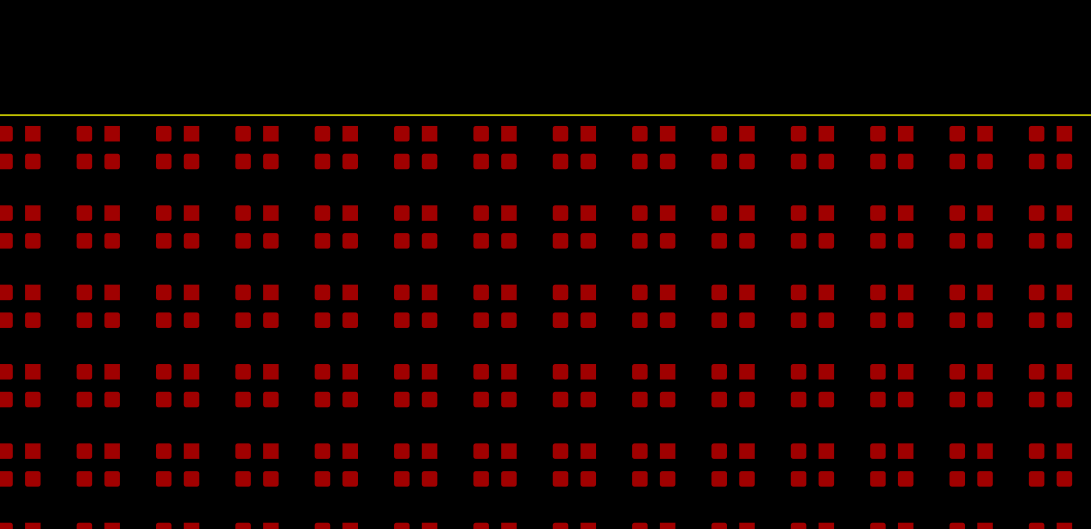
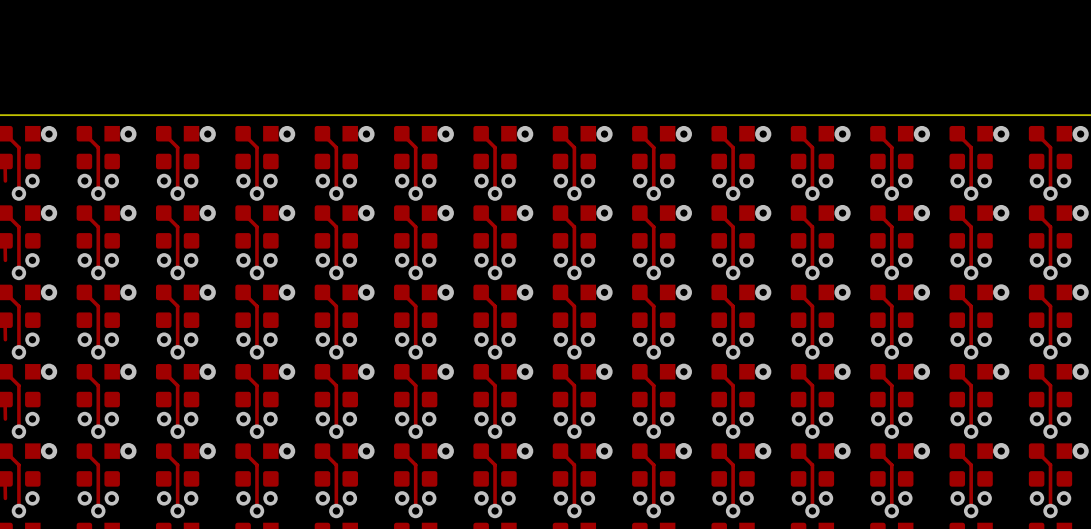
top track: none -> (5, 133) (18, 147) (18, 193)
top track: none -> (84, 133) (98, 147) (98, 193)
top track: none -> (163, 133) (177, 147) (177, 193)
top track: none -> (243, 133) (256, 147) (256, 193)
top track: none -> (322, 133) (336, 147) (336, 193)
top track: none -> (401, 133) (415, 147) (415, 193)
top track: none -> (481, 133) (495, 147) (495, 193)
top track: none -> (560, 133) (574, 147) (574, 193)
top track: none -> (639, 133) (653, 147) (653, 193)
top track: none -> (719, 133) (733, 147) (733, 193)
top track: none -> (798, 133) (812, 147) (812, 193)
top track: none -> (877, 133) (891, 147) (891, 193)
top track: none -> (957, 133) (971, 147) (971, 193)
top track: none -> (1036, 133) (1050, 147) (1050, 193)
via: none -> (49, 134)
via: none -> (128, 134)
via: none -> (207, 134)
via: none -> (287, 134)
via: none -> (366, 134)
via: none -> (445, 134)
via: none -> (525, 134)
via: none -> (604, 134)
via: none -> (683, 134)
via: none -> (763, 134)
via: none -> (842, 134)
via: none -> (921, 134)
via: none -> (1001, 134)
via: none -> (1080, 134)
top track: none -> (5, 161) (5, 180)
via: none -> (32, 180)
via: none -> (84, 180)
via: none -> (111, 180)
via: none -> (164, 180)
via: none -> (191, 180)
via: none -> (243, 180)
via: none -> (270, 180)
via: none -> (322, 180)
via: none -> (349, 180)
via: none -> (402, 180)
via: none -> (429, 180)
via: none -> (481, 180)
via: none -> (508, 180)
via: none -> (560, 180)
via: none -> (587, 180)
via: none -> (640, 180)
via: none -> (667, 180)
via: none -> (719, 180)
via: none -> (746, 180)
via: none -> (798, 180)
via: none -> (825, 180)
via: none -> (878, 180)
via: none -> (905, 180)
via: none -> (957, 180)
via: none -> (984, 180)
via: none -> (1036, 180)
via: none -> (1064, 180)
via: none -> (18, 193)
via: none -> (98, 193)
via: none -> (177, 193)
via: none -> (256, 193)
via: none -> (336, 193)
via: none -> (415, 193)
via: none -> (495, 193)
via: none -> (574, 193)
via: none -> (653, 193)
via: none -> (733, 193)
via: none -> (812, 193)
via: none -> (891, 193)
via: none -> (971, 193)
via: none -> (1050, 193)
top track: none -> (5, 213) (18, 226) (18, 272)
via: none -> (49, 213)
top track: none -> (84, 213) (98, 226) (98, 272)
via: none -> (128, 213)
top track: none -> (163, 213) (177, 226) (177, 272)
via: none -> (207, 213)
top track: none -> (243, 213) (256, 226) (256, 272)
via: none -> (287, 213)
top track: none -> (322, 213) (336, 226) (336, 272)
via: none -> (366, 213)
top track: none -> (401, 213) (415, 226) (415, 272)
via: none -> (445, 213)
top track: none -> (481, 213) (495, 226) (495, 272)
via: none -> (525, 213)
top track: none -> (560, 213) (574, 226) (574, 272)
via: none -> (604, 213)
top track: none -> (639, 213) (653, 226) (653, 272)
via: none -> (683, 213)
top track: none -> (719, 213) (733, 226) (733, 272)
via: none -> (763, 213)
top track: none -> (798, 213) (812, 226) (812, 272)
via: none -> (842, 213)
top track: none -> (877, 213) (891, 226) (891, 272)
via: none -> (921, 213)
top track: none -> (957, 213) (971, 226) (971, 272)
via: none -> (1001, 213)
top track: none -> (1036, 213) (1050, 226) (1050, 272)
via: none -> (1080, 213)
top track: none -> (5, 240) (5, 260)
via: none -> (32, 260)
via: none -> (84, 260)
via: none -> (111, 260)
via: none -> (164, 260)
via: none -> (191, 260)
via: none -> (243, 260)
via: none -> (270, 260)
via: none -> (322, 260)
via: none -> (349, 260)
via: none -> (402, 260)
via: none -> (429, 260)
via: none -> (481, 260)
via: none -> (508, 260)
via: none -> (560, 260)
via: none -> (587, 260)
via: none -> (640, 260)
via: none -> (667, 260)
via: none -> (719, 260)
via: none -> (746, 260)
via: none -> (798, 260)
via: none -> (825, 260)
via: none -> (878, 260)
via: none -> (905, 260)
via: none -> (957, 260)
via: none -> (984, 260)
via: none -> (1036, 260)
via: none -> (1064, 260)
via: none -> (18, 272)
via: none -> (98, 272)
via: none -> (177, 272)
via: none -> (256, 272)
via: none -> (336, 272)
via: none -> (415, 272)
via: none -> (495, 272)
via: none -> (574, 272)
via: none -> (653, 272)
via: none -> (733, 272)
via: none -> (812, 272)
via: none -> (891, 272)
via: none -> (971, 272)
via: none -> (1050, 272)
top track: none -> (5, 292) (18, 306) (18, 352)
via: none -> (49, 292)
top track: none -> (84, 292) (98, 306) (98, 352)
via: none -> (128, 292)
top track: none -> (163, 292) (177, 306) (177, 352)
via: none -> (207, 292)
top track: none -> (243, 292) (256, 306) (256, 352)
via: none -> (287, 292)
top track: none -> (322, 292) (336, 306) (336, 352)
via: none -> (366, 292)
top track: none -> (401, 292) (415, 306) (415, 352)
via: none -> (445, 292)
top track: none -> (481, 292) (495, 306) (495, 352)
via: none -> (525, 292)
top track: none -> (560, 292) (574, 306) (574, 352)
via: none -> (604, 292)
top track: none -> (639, 292) (653, 306) (653, 352)
via: none -> (683, 292)
top track: none -> (719, 292) (733, 306) (733, 352)
via: none -> (763, 292)
top track: none -> (798, 292) (812, 306) (812, 352)
via: none -> (842, 292)
top track: none -> (877, 292) (891, 306) (891, 352)
via: none -> (921, 292)
top track: none -> (957, 292) (971, 306) (971, 352)
via: none -> (1001, 292)
top track: none -> (1036, 292) (1050, 306) (1050, 352)
via: none -> (1080, 292)
top track: none -> (5, 320) (5, 339)
via: none -> (32, 339)
via: none -> (84, 339)
via: none -> (111, 339)
via: none -> (164, 339)
via: none -> (191, 339)
via: none -> (243, 339)
via: none -> (270, 339)
via: none -> (322, 339)
via: none -> (349, 339)
via: none -> (402, 339)
via: none -> (429, 339)
via: none -> (481, 339)
via: none -> (508, 339)
via: none -> (560, 339)
via: none -> (587, 339)
via: none -> (640, 339)
via: none -> (667, 339)
via: none -> (719, 339)
via: none -> (746, 339)
via: none -> (798, 339)
via: none -> (825, 339)
via: none -> (878, 339)
via: none -> (905, 339)
via: none -> (957, 339)
via: none -> (984, 339)
via: none -> (1036, 339)
via: none -> (1064, 339)
via: none -> (18, 352)
via: none -> (98, 352)
via: none -> (177, 352)
via: none -> (256, 352)
via: none -> (336, 352)
via: none -> (415, 352)
via: none -> (495, 352)
via: none -> (574, 352)
via: none -> (653, 352)
via: none -> (733, 352)
via: none -> (812, 352)
via: none -> (891, 352)
via: none -> (971, 352)
via: none -> (1050, 352)
top track: none -> (5, 371) (18, 385) (18, 431)
via: none -> (49, 371)
top track: none -> (84, 371) (98, 385) (98, 431)
via: none -> (128, 371)
top track: none -> (163, 371) (177, 385) (177, 431)
via: none -> (207, 371)
top track: none -> (243, 371) (256, 385) (256, 431)
via: none -> (287, 371)
top track: none -> (322, 371) (336, 385) (336, 431)
via: none -> (366, 371)
top track: none -> (401, 371) (415, 385) (415, 431)
via: none -> (445, 371)
top track: none -> (481, 371) (495, 385) (495, 431)
via: none -> (525, 371)
top track: none -> (560, 371) (574, 385) (574, 431)
via: none -> (604, 371)
top track: none -> (639, 371) (653, 385) (653, 431)
via: none -> (683, 371)
top track: none -> (719, 371) (733, 385) (733, 431)
via: none -> (763, 371)
top track: none -> (798, 371) (812, 385) (812, 431)
via: none -> (842, 371)
top track: none -> (877, 371) (891, 385) (891, 431)
via: none -> (921, 371)
top track: none -> (957, 371) (971, 385) (971, 431)
via: none -> (1001, 371)
top track: none -> (1036, 371) (1050, 385) (1050, 431)
via: none -> (1080, 371)
top track: none -> (5, 399) (5, 419)
via: none -> (32, 419)
via: none -> (84, 419)
via: none -> (111, 419)
via: none -> (164, 419)
via: none -> (191, 419)
via: none -> (243, 419)
via: none -> (270, 419)
via: none -> (322, 419)
via: none -> (349, 419)
via: none -> (402, 419)
via: none -> (429, 419)
via: none -> (481, 419)
via: none -> (508, 419)
via: none -> (560, 419)
via: none -> (587, 419)
via: none -> (640, 419)
via: none -> (667, 419)
via: none -> (719, 419)
via: none -> (746, 419)
via: none -> (798, 419)
via: none -> (825, 419)
via: none -> (878, 419)
via: none -> (905, 419)
via: none -> (957, 419)
via: none -> (984, 419)
via: none -> (1036, 419)
via: none -> (1064, 419)
via: none -> (18, 431)
via: none -> (98, 431)
via: none -> (177, 431)
via: none -> (256, 431)
via: none -> (336, 431)
via: none -> (415, 431)
via: none -> (495, 431)
via: none -> (574, 431)
via: none -> (653, 431)
via: none -> (733, 431)
via: none -> (812, 431)
via: none -> (891, 431)
via: none -> (971, 431)
via: none -> (1050, 431)
top track: none -> (5, 451) (18, 465) (18, 511)
via: none -> (49, 451)
top track: none -> (84, 451) (98, 465) (98, 511)
via: none -> (128, 451)
top track: none -> (163, 451) (177, 465) (177, 511)
via: none -> (207, 451)
top track: none -> (243, 451) (256, 465) (256, 511)
via: none -> (287, 451)
top track: none -> (322, 451) (336, 465) (336, 511)
via: none -> (366, 451)
top track: none -> (401, 451) (415, 465) (415, 511)
via: none -> (445, 451)
top track: none -> (481, 451) (495, 465) (495, 511)
via: none -> (525, 451)
top track: none -> (560, 451) (574, 465) (574, 511)
via: none -> (604, 451)
top track: none -> (639, 451) (653, 465) (653, 511)
via: none -> (683, 451)
top track: none -> (719, 451) (733, 465) (733, 511)
via: none -> (763, 451)
top track: none -> (798, 451) (812, 465) (812, 511)
via: none -> (842, 451)
top track: none -> (877, 451) (891, 465) (891, 511)
via: none -> (921, 451)
top track: none -> (957, 451) (971, 465) (971, 511)
via: none -> (1001, 451)
top track: none -> (1036, 451) (1050, 465) (1050, 511)
via: none -> (1080, 451)
top track: none -> (5, 478) (5, 498)
via: none -> (32, 498)
via: none -> (84, 498)
via: none -> (111, 498)
via: none -> (164, 498)
via: none -> (191, 498)
via: none -> (243, 498)
via: none -> (270, 498)
via: none -> (322, 498)
via: none -> (349, 498)
via: none -> (402, 498)
via: none -> (429, 498)
via: none -> (481, 498)
via: none -> (508, 498)
via: none -> (560, 498)
via: none -> (587, 498)
via: none -> (640, 498)
via: none -> (667, 498)
via: none -> (719, 498)
via: none -> (746, 498)
via: none -> (798, 498)
via: none -> (825, 498)
via: none -> (878, 498)
via: none -> (905, 498)
via: none -> (957, 498)
via: none -> (984, 498)
via: none -> (1036, 498)
via: none -> (1064, 498)
via: none -> (18, 511)
via: none -> (98, 511)
via: none -> (177, 511)
via: none -> (256, 511)
via: none -> (336, 511)
via: none -> (415, 511)
via: none -> (495, 511)
via: none -> (574, 511)
via: none -> (653, 511)
via: none -> (733, 511)
via: none -> (812, 511)
via: none -> (891, 511)
via: none -> (971, 511)
via: none -> (1050, 511)

